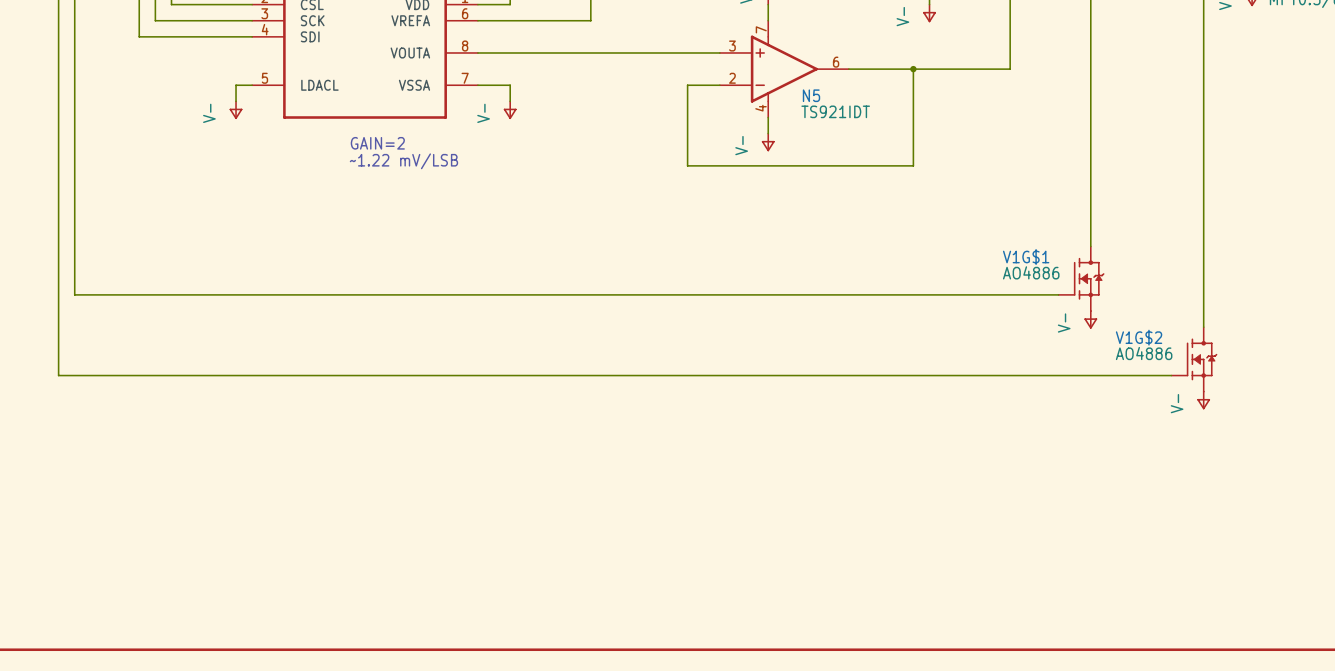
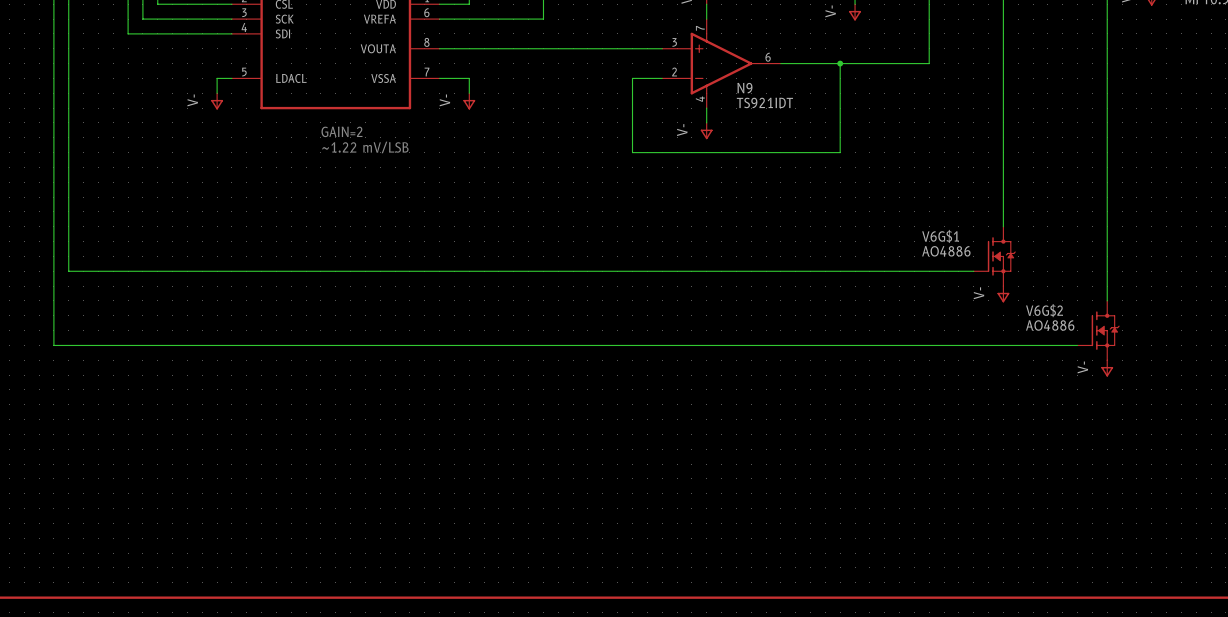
N5 name: N5 (811, 95) -> N9 (744, 88)
V1G$1 name: V1G$1 (1026, 257) -> V6G$1 (940, 236)
V1G$2 name: V1G$2 (1139, 337) -> V6G$2 (1044, 310)

